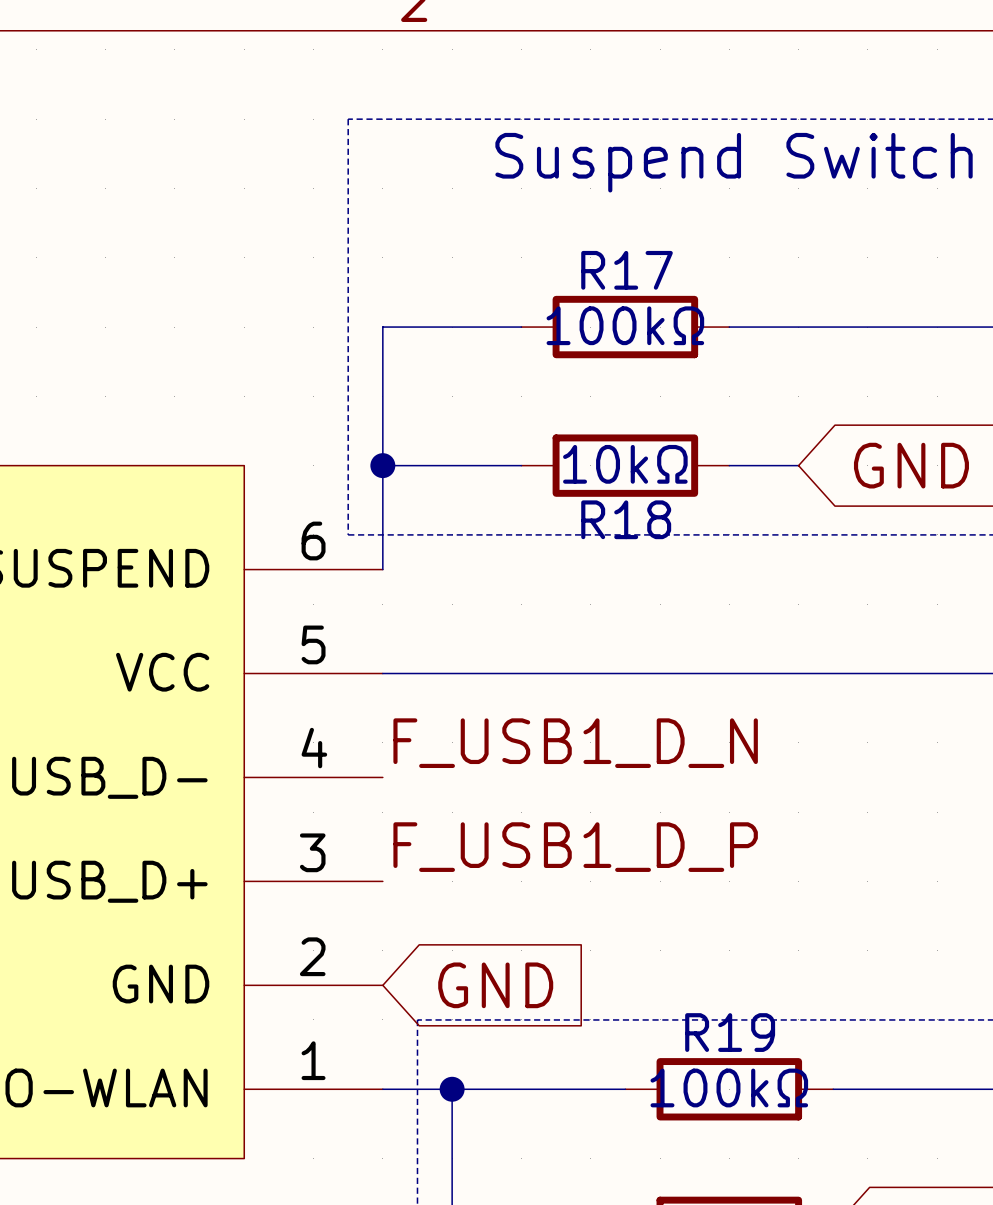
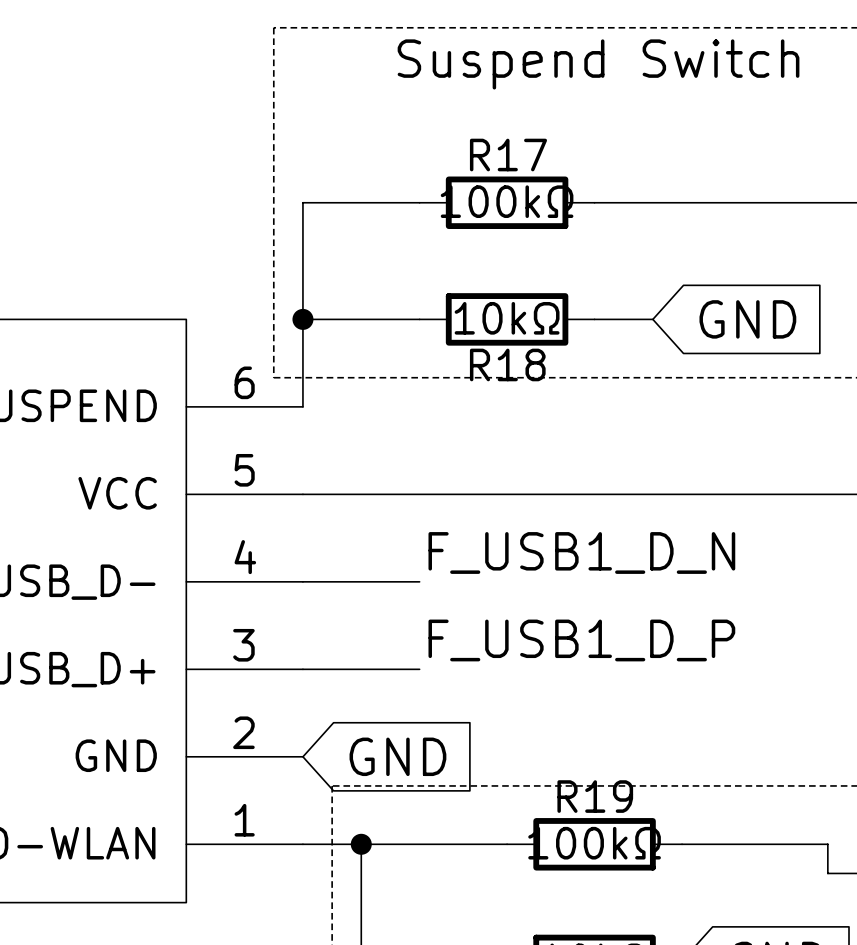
label position: F_USB1_D_N (575, 743) -> F_USB1_D_N (581, 552)
wire: none -> (302, 581) (419, 581)
label position: F_USB1_D_P (575, 847) -> F_USB1_D_P (581, 640)
wire: none -> (302, 669) (419, 669)

